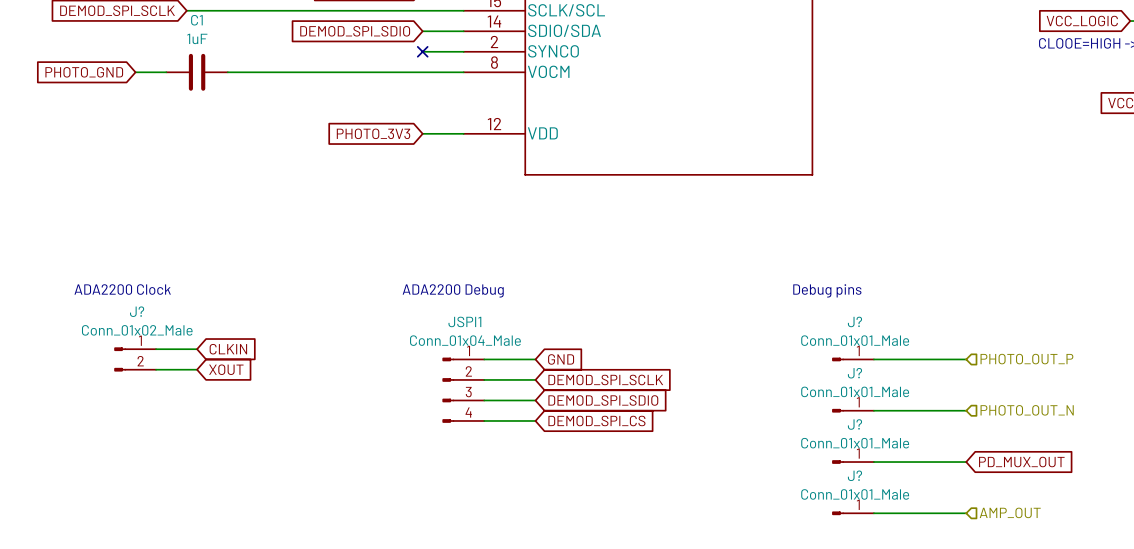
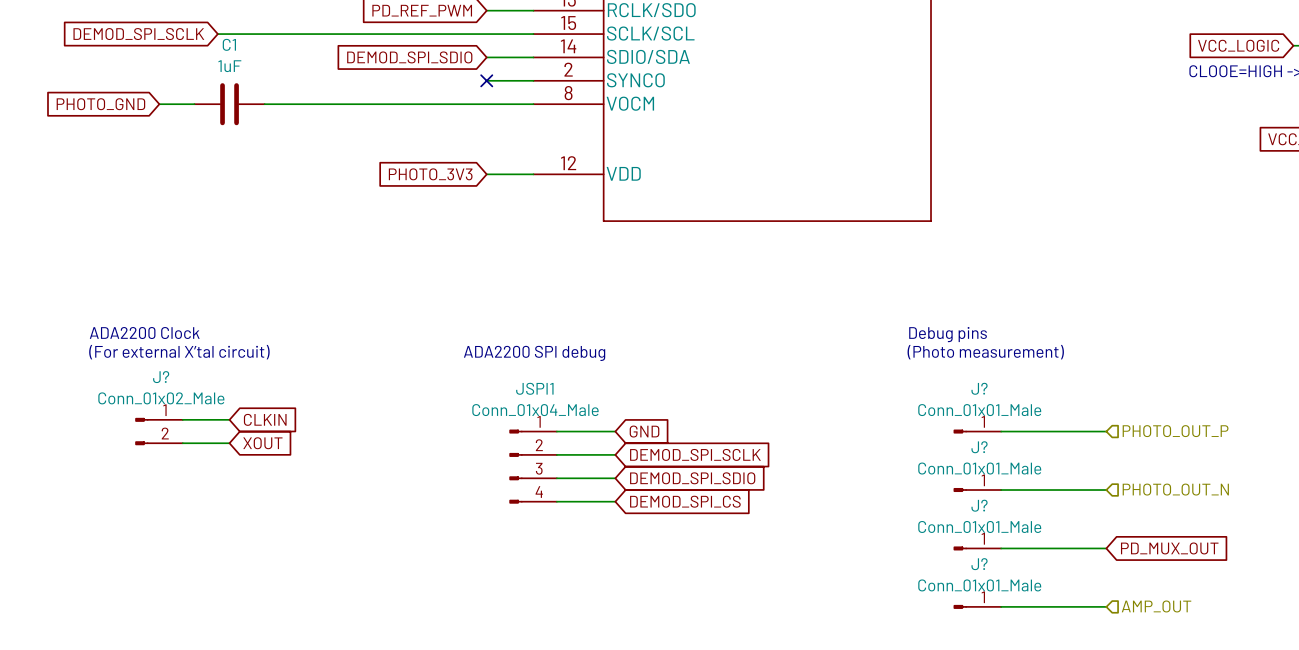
text: none -> ADA2200 Clock (144, 333)
text: none -> Debug pins (948, 334)
text: ADA2200 Clock (122, 289) -> (For external X’tal circuit) (179, 352)
text: ADA2200 Debug (453, 290) -> ADA2200 SPI debug (534, 353)
text: Debug pins (827, 290) -> (Photo measurement) (985, 352)

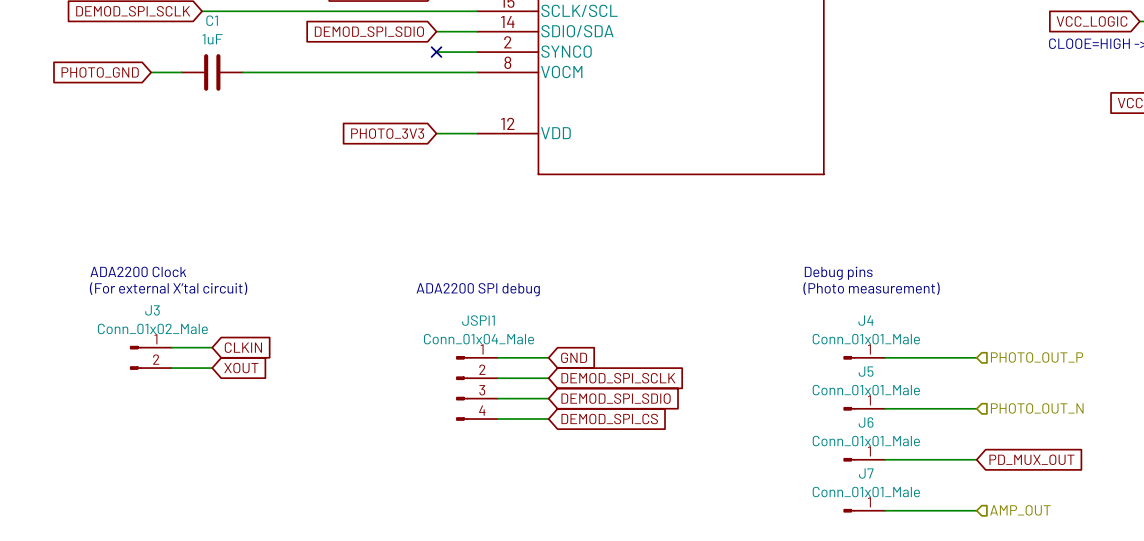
J? name: J? (161, 377) -> J3 (152, 310)
J? name: J? (979, 388) -> J4 (866, 320)
J? name: J? (979, 447) -> J5 (866, 371)
J? name: J? (979, 505) -> J6 (866, 422)
J? name: J? (979, 564) -> J7 (866, 473)

